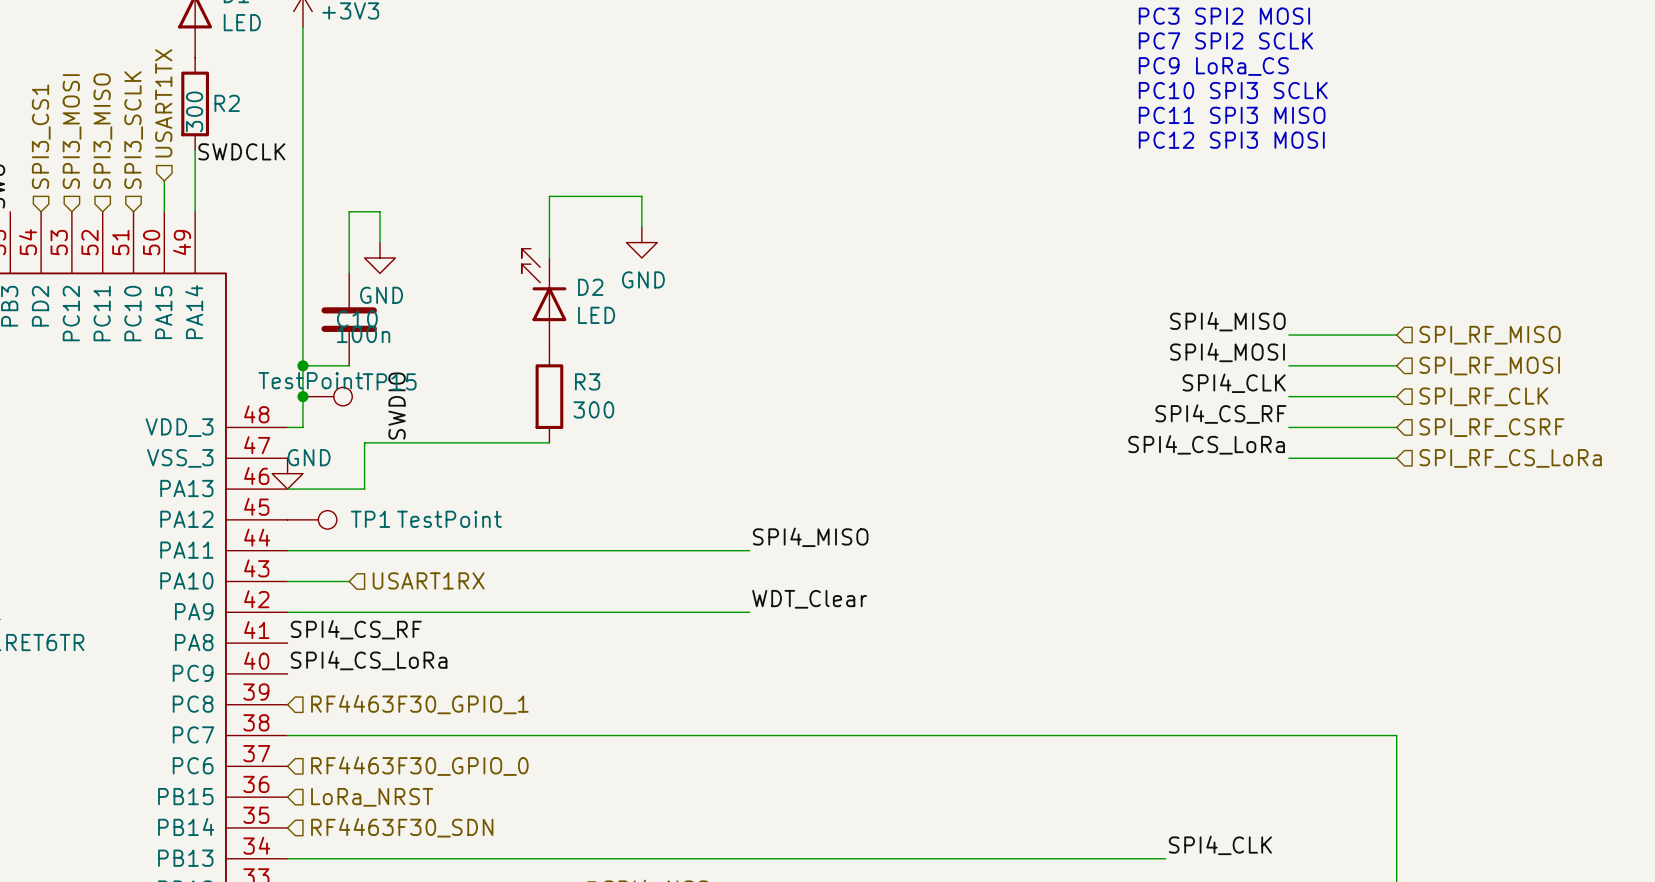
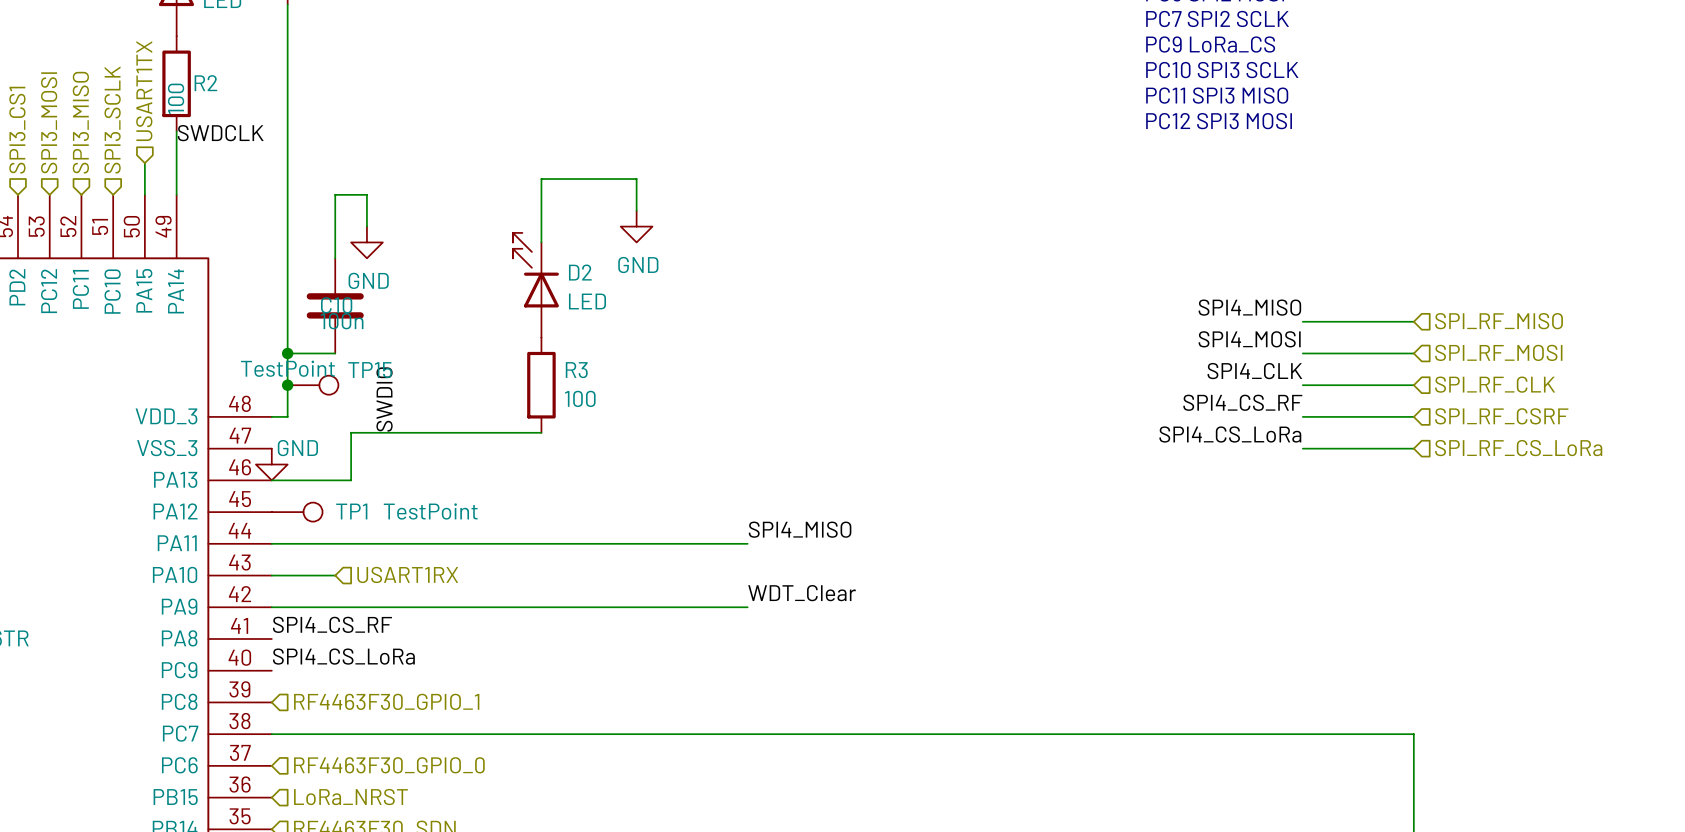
R2 value: 300 (194, 111) -> 100 (176, 98)
R3 value: 300 (593, 409) -> 100 (580, 398)

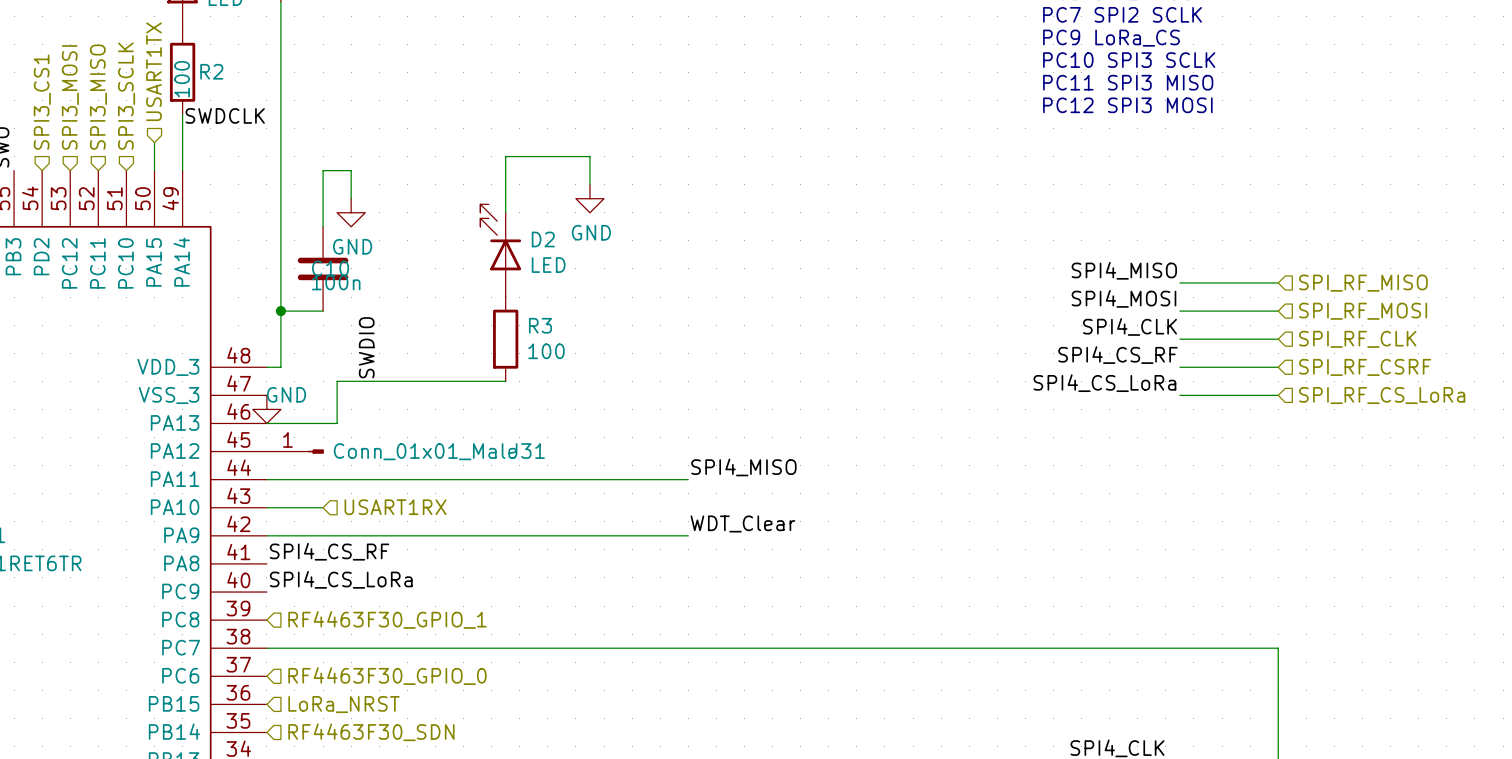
junction: (287, 385) -> none
TP15: TestPoint (313, 385) -> none
TP1: TestPoint (297, 512) -> none
J31: none -> Conn_01x01_Male (295, 451)

